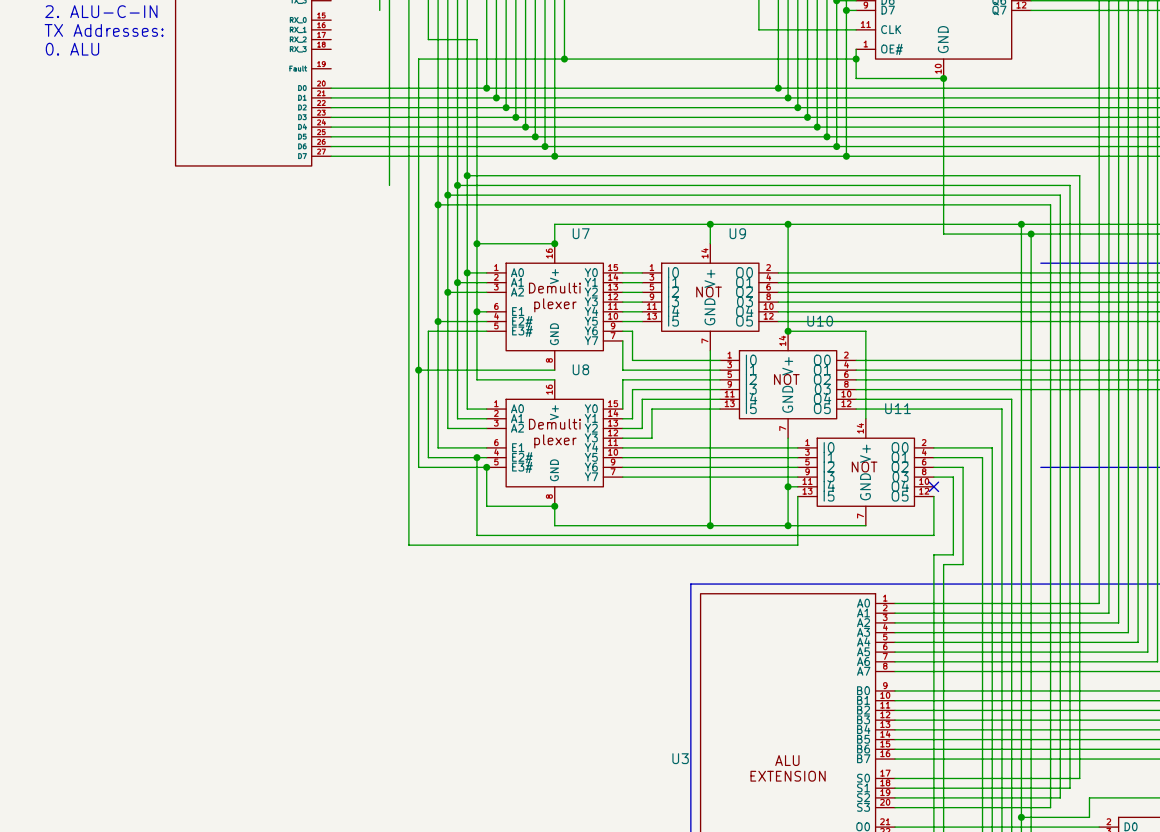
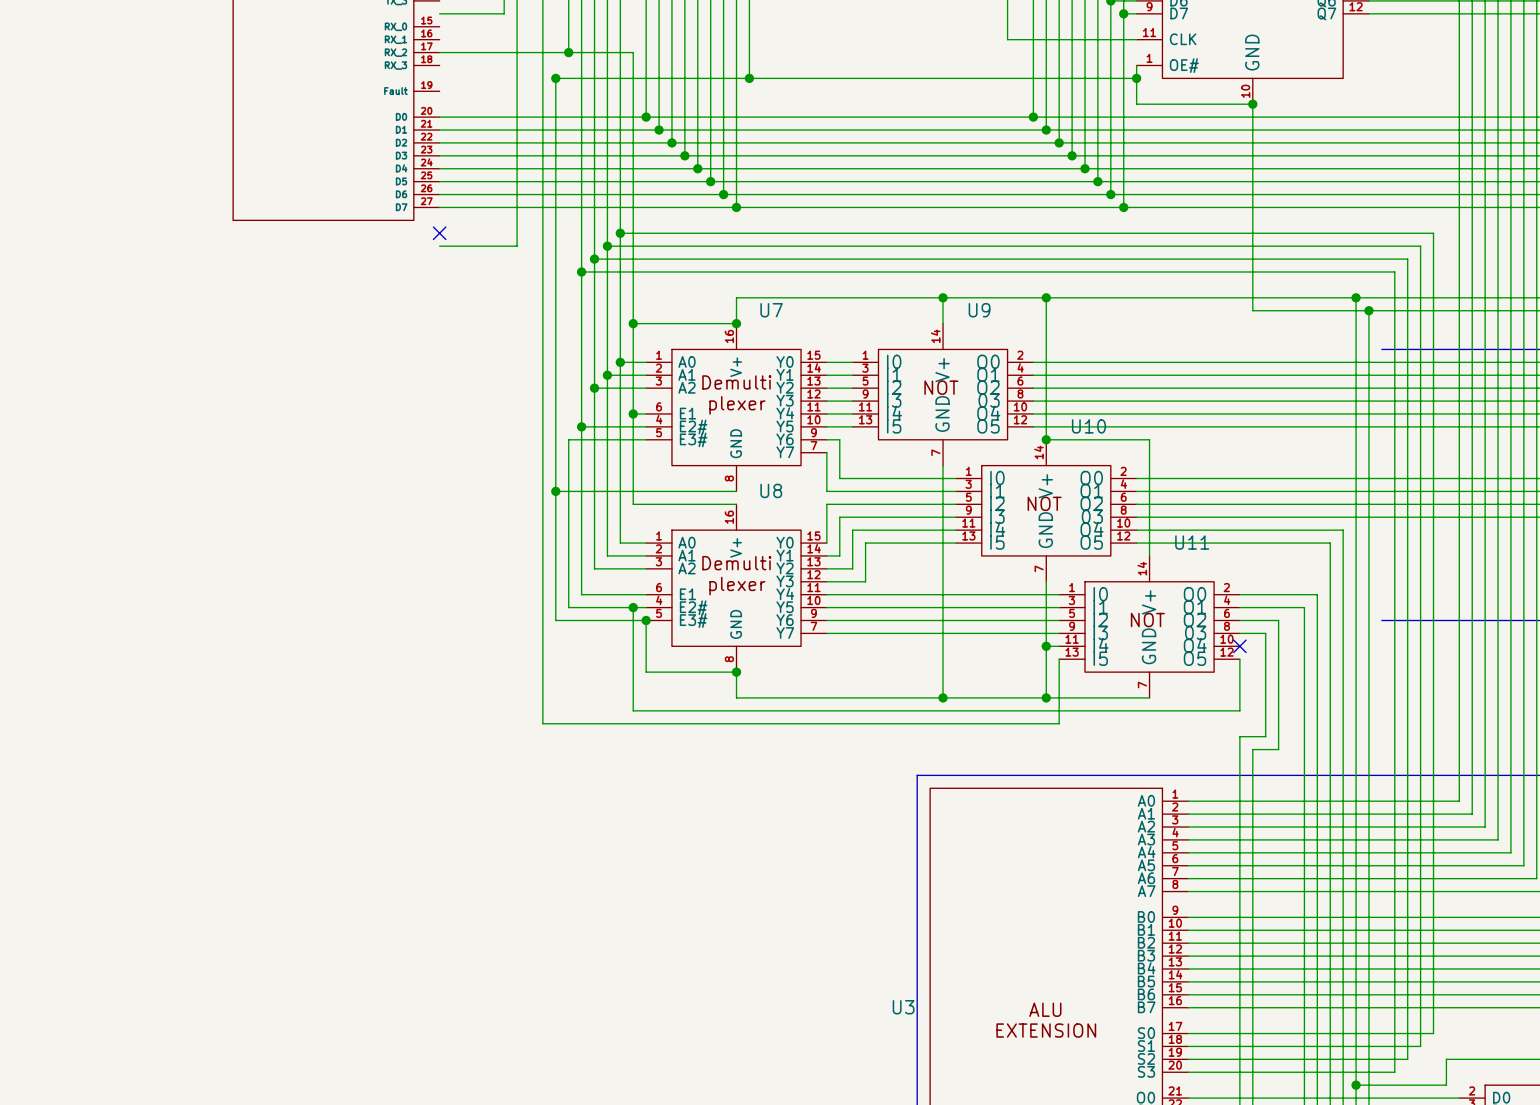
wire: none -> (439, 13) (504, 13)
text: 2. ALU-C-IN (101, 11) -> none
text: TX Addresses: (104, 30) -> none
wire: none -> (439, 52) (568, 52)
junction: none -> (568, 52)
text: 0. ALU (72, 49) -> none
junction: none -> (555, 78)
no-connect mark: none -> (439, 233)
wire: none -> (439, 246) (517, 246)

